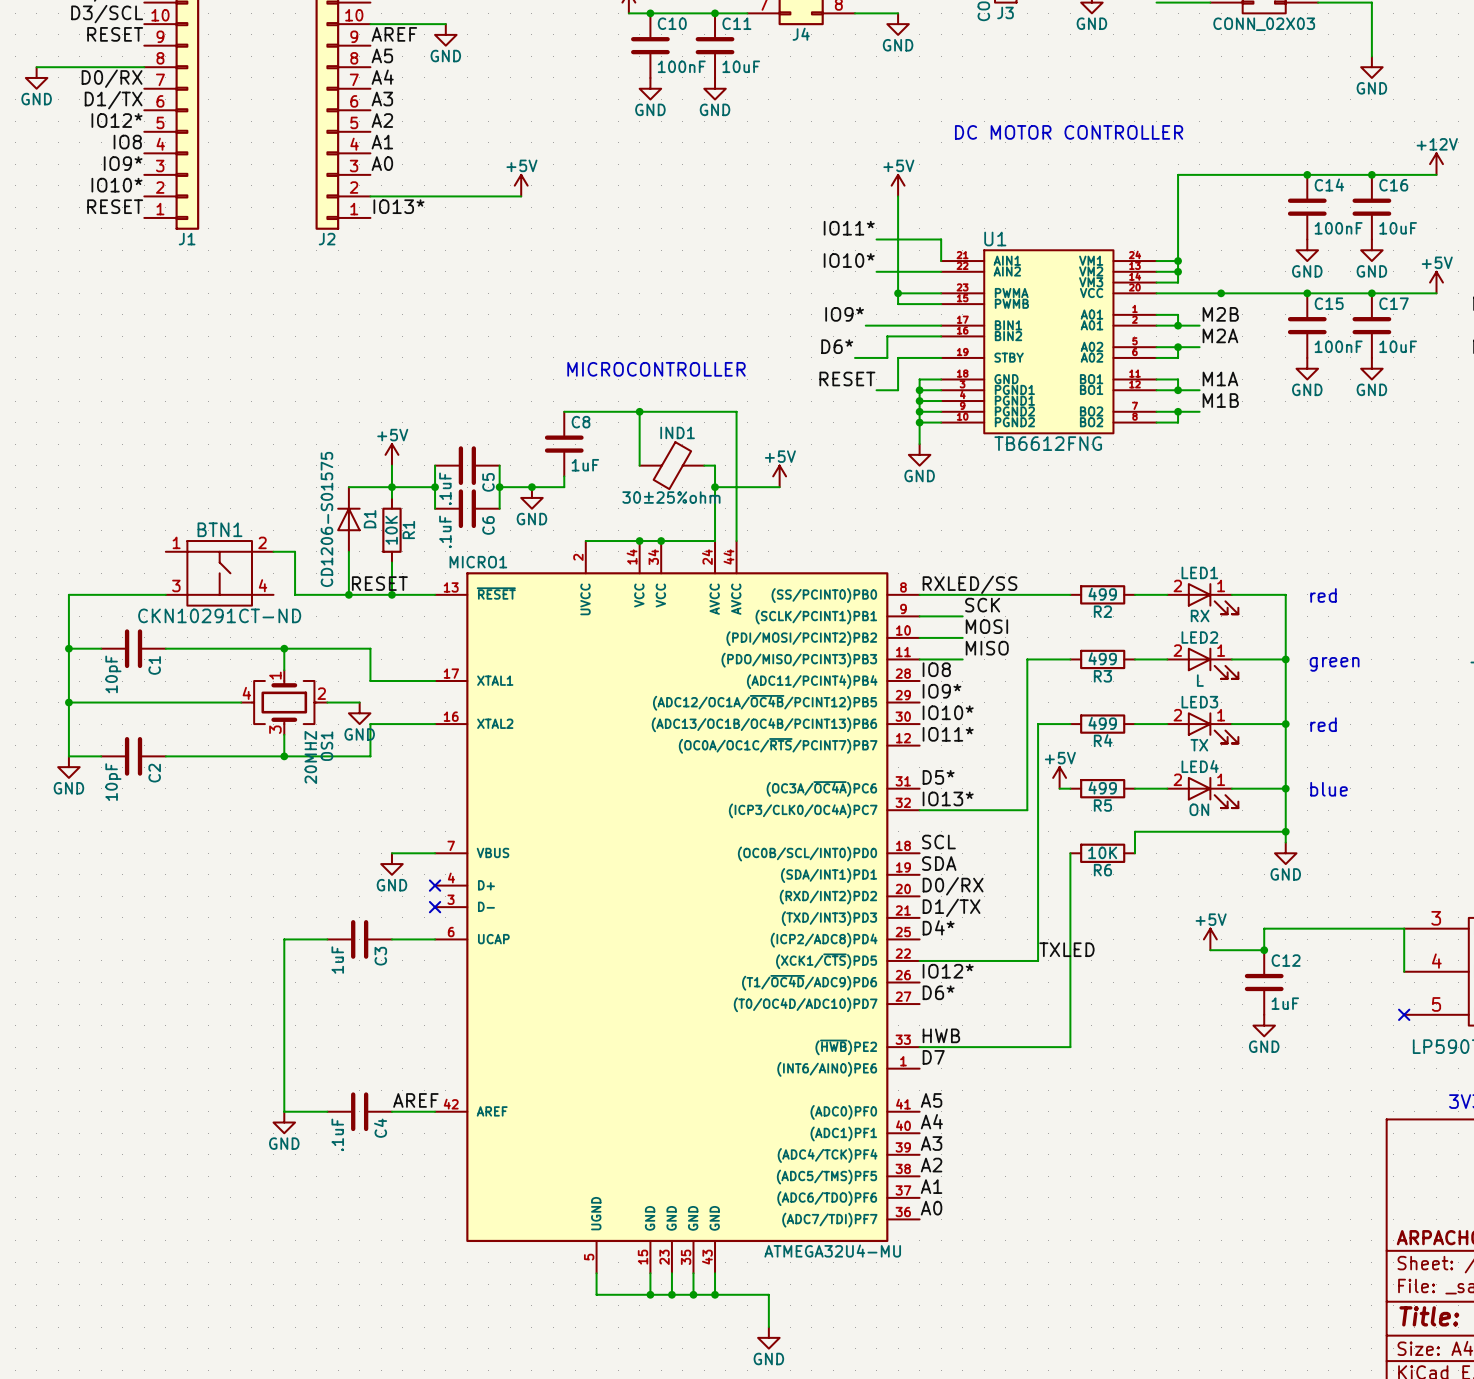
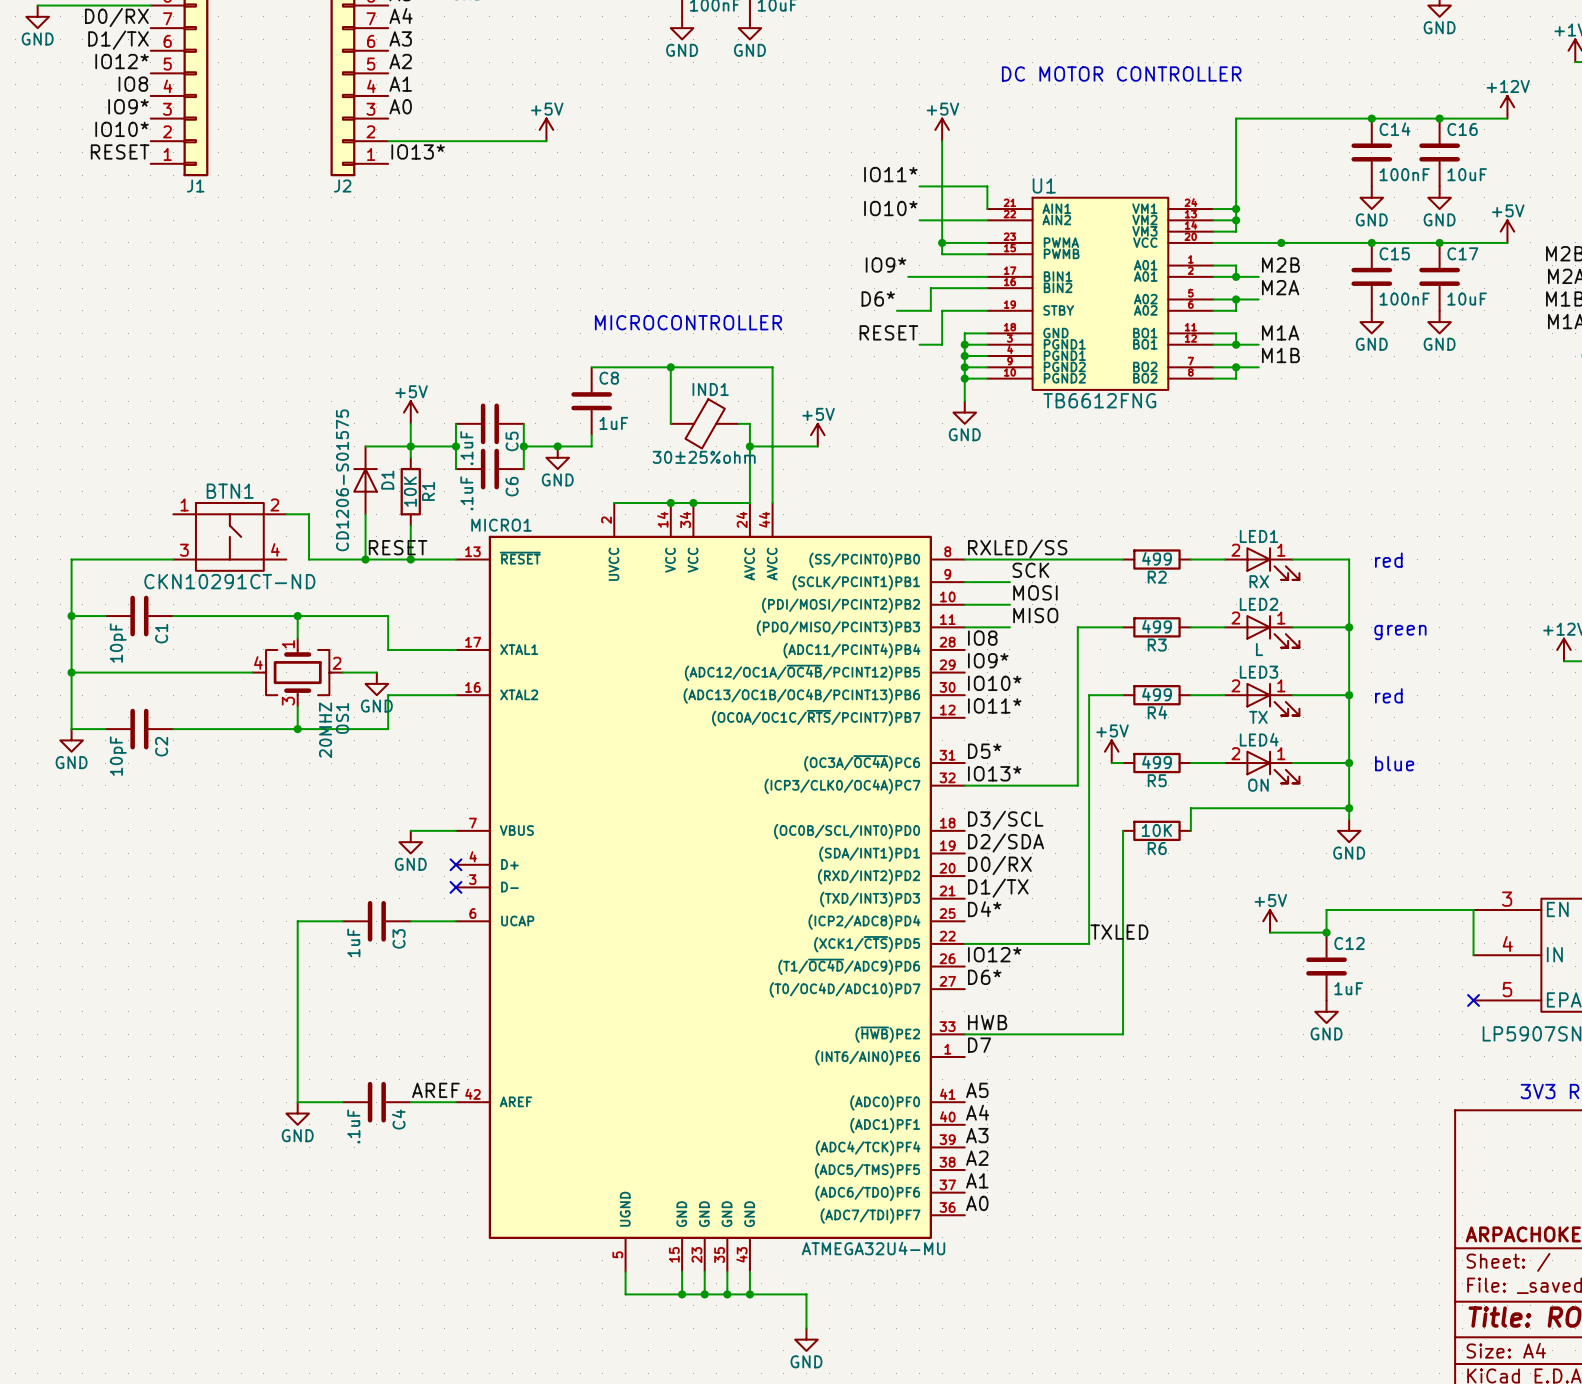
label: SCL (938, 842) -> D3/SCL (1005, 820)
label: SDA (939, 863) -> D2/SDA (1006, 842)

